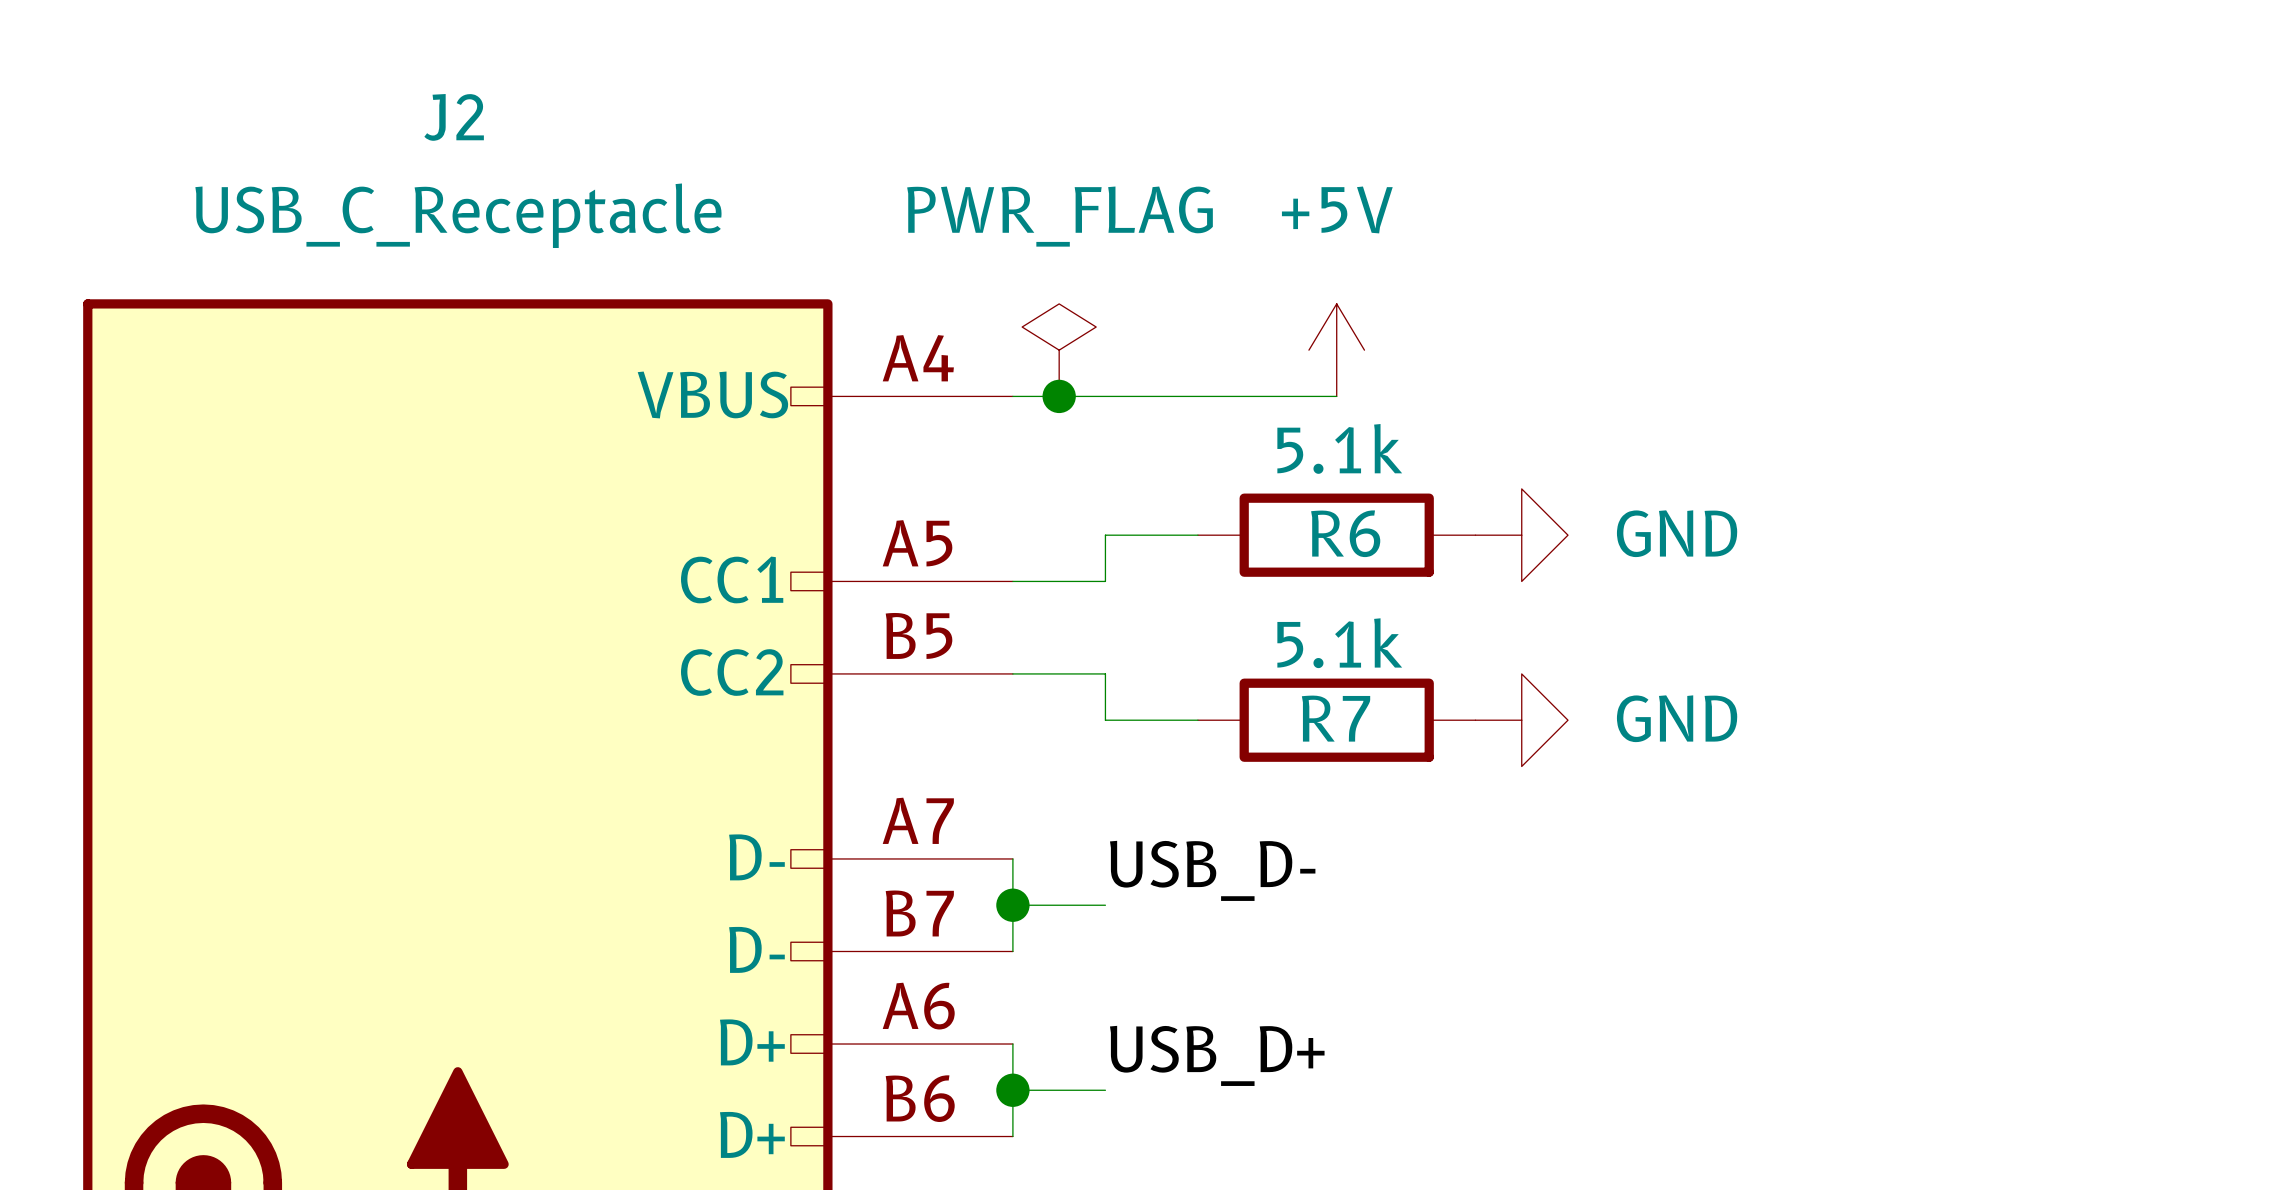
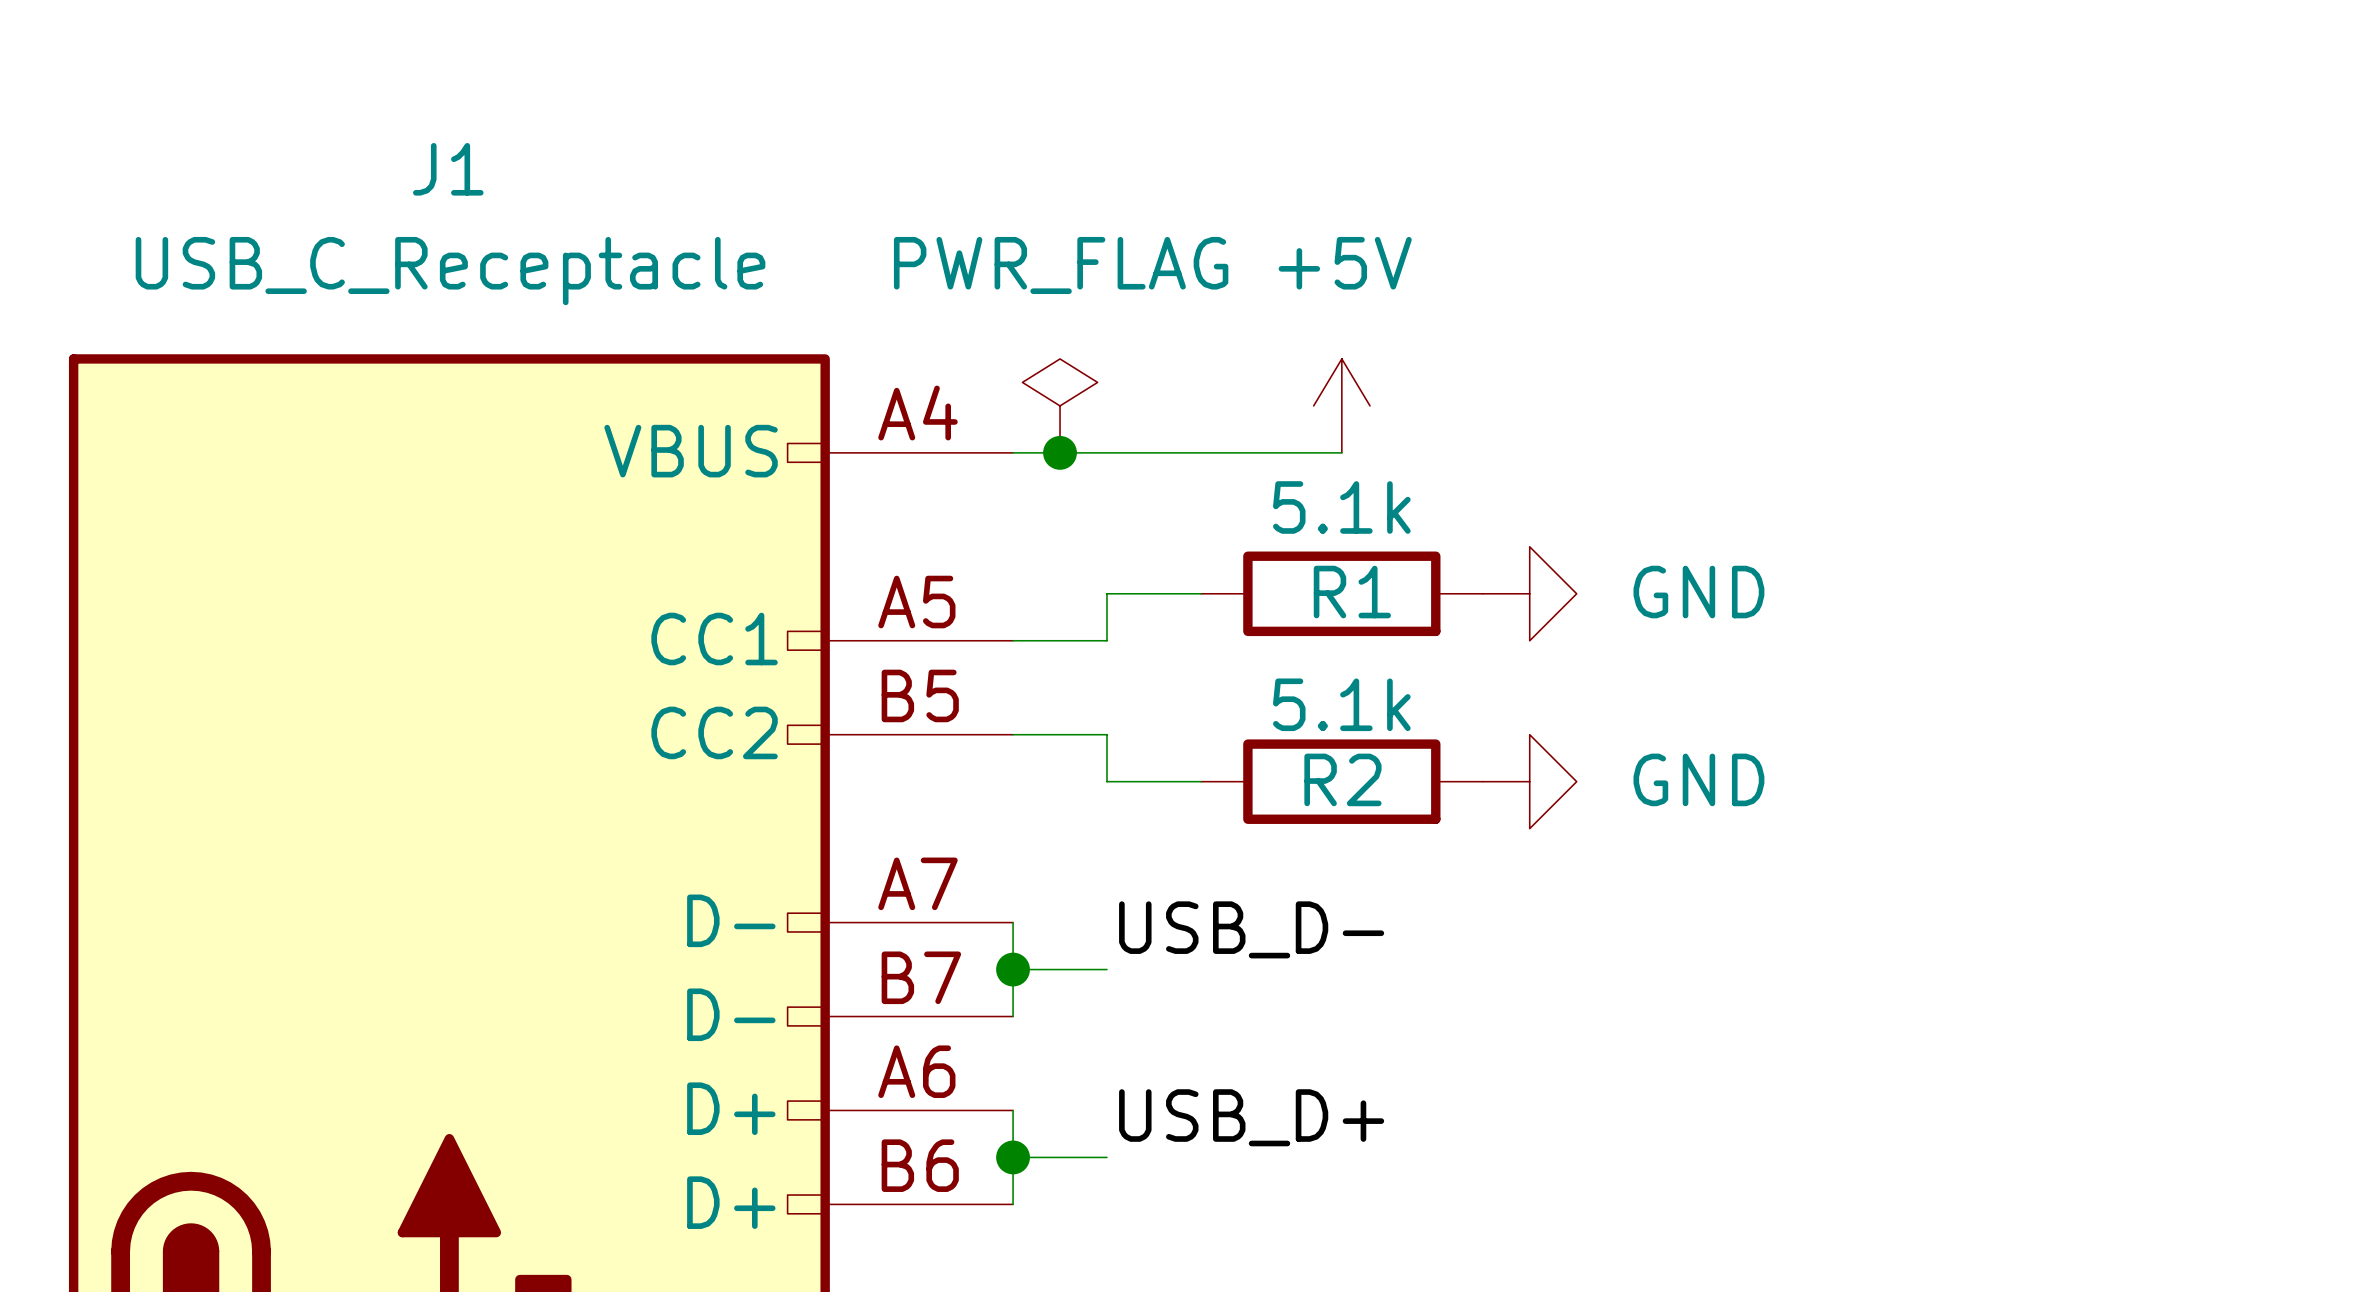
J2 name: J2 (454, 117) -> J1 (448, 169)
R6 name: R6 (1345, 533) -> R1 (1352, 592)
R7 name: R7 (1336, 718) -> R2 (1342, 779)

